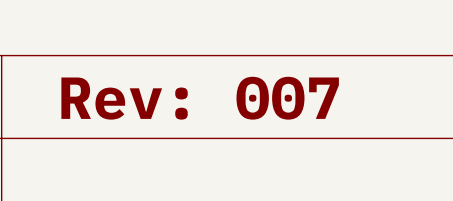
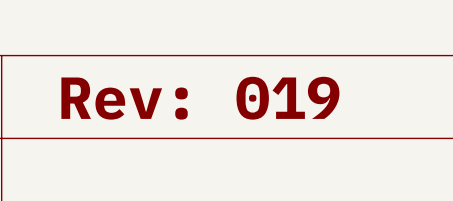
title block: Rev: 007 (200, 98) -> Rev: 019 (200, 98)

